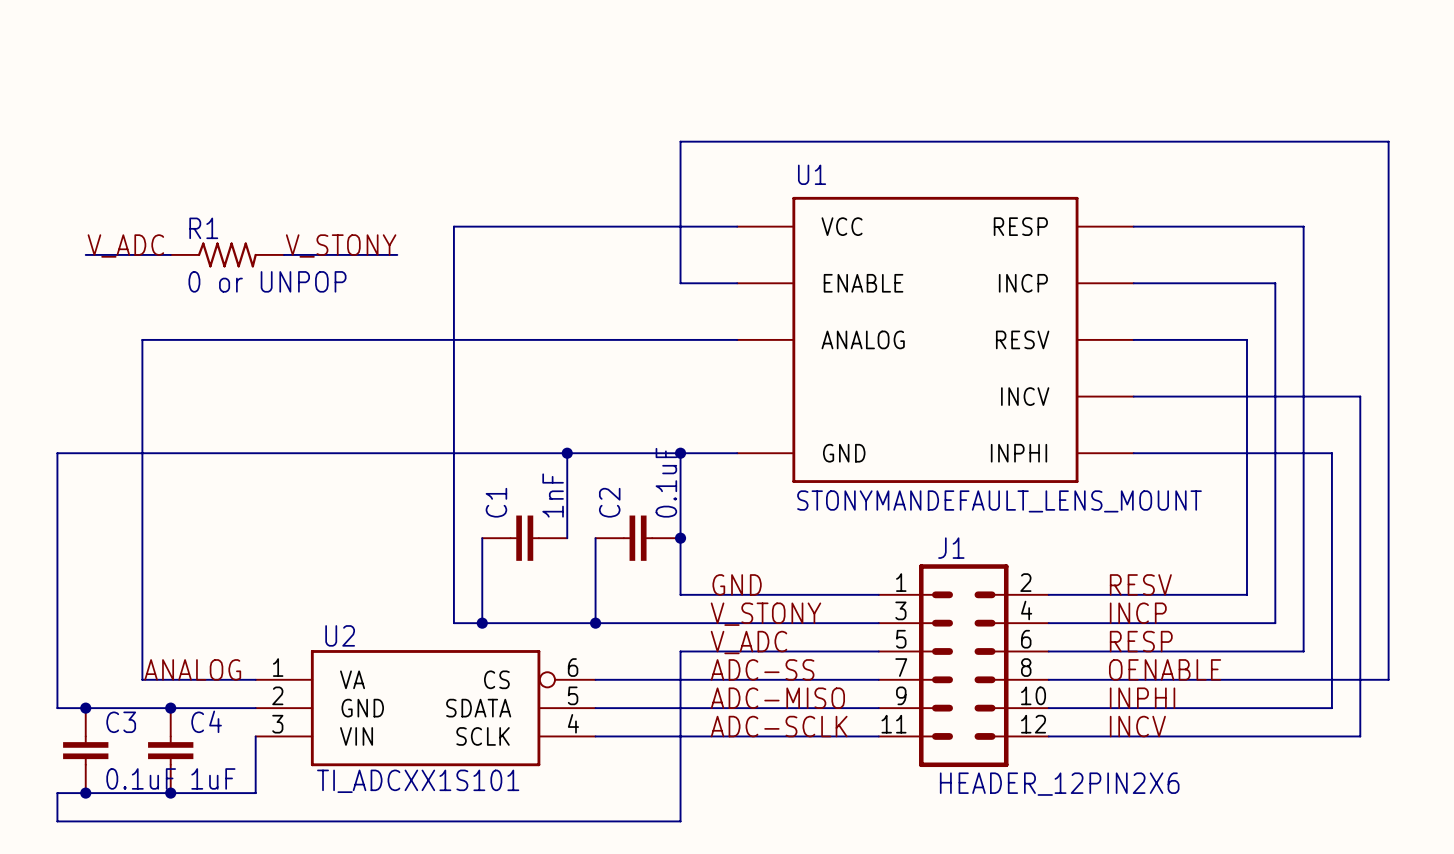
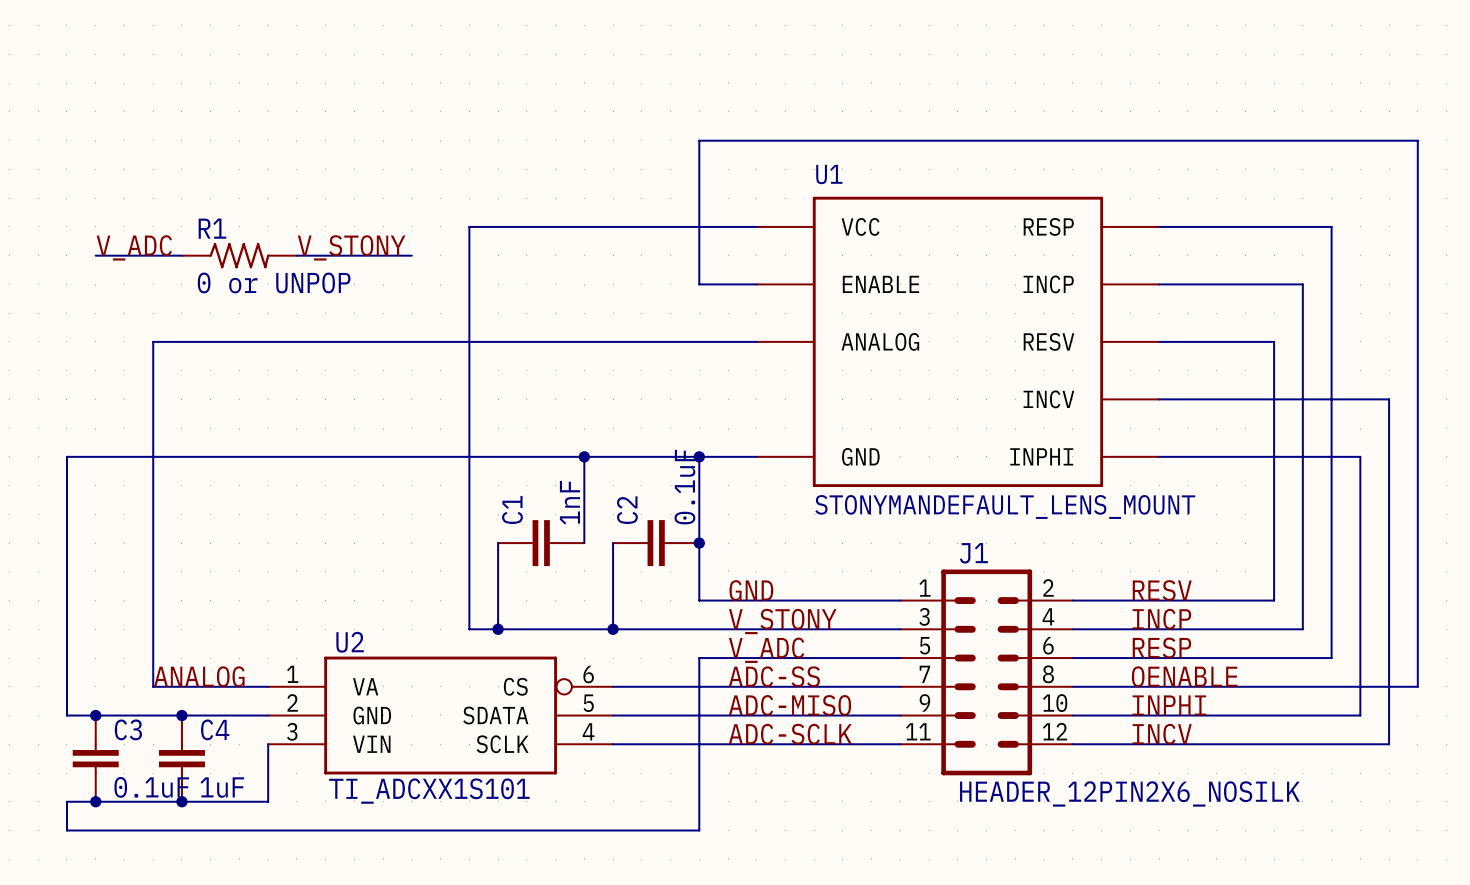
J1 value: HEADER_12PIN2X6 (1059, 784) -> HEADER_12PIN2X6_NOSILK (1129, 793)

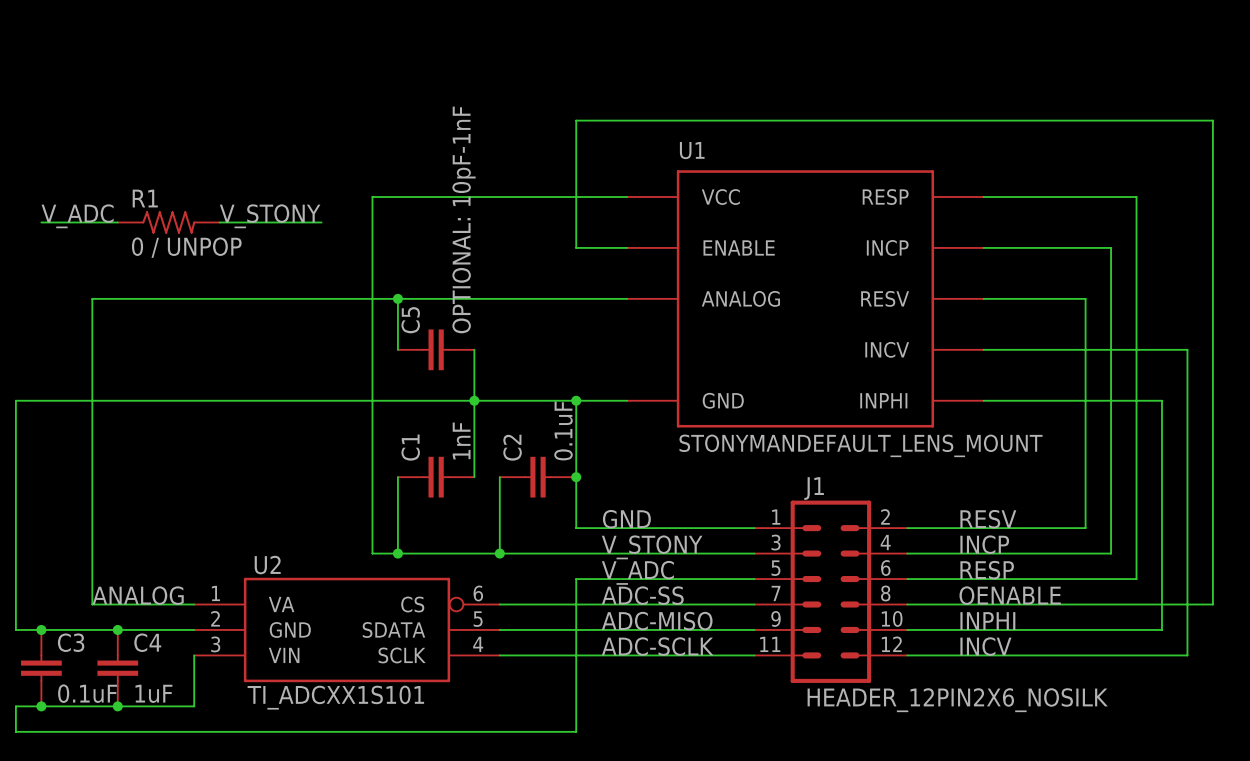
R1 value: 0 or UNPOP (274, 282) -> 0 / UNPOP (186, 247)
wire: none -> (397, 298) (397, 349)
junction: none -> (397, 298)
C5: none -> OPTIONAL: 10pF-1nF (436, 349)
wire: none -> (474, 349) (474, 400)

